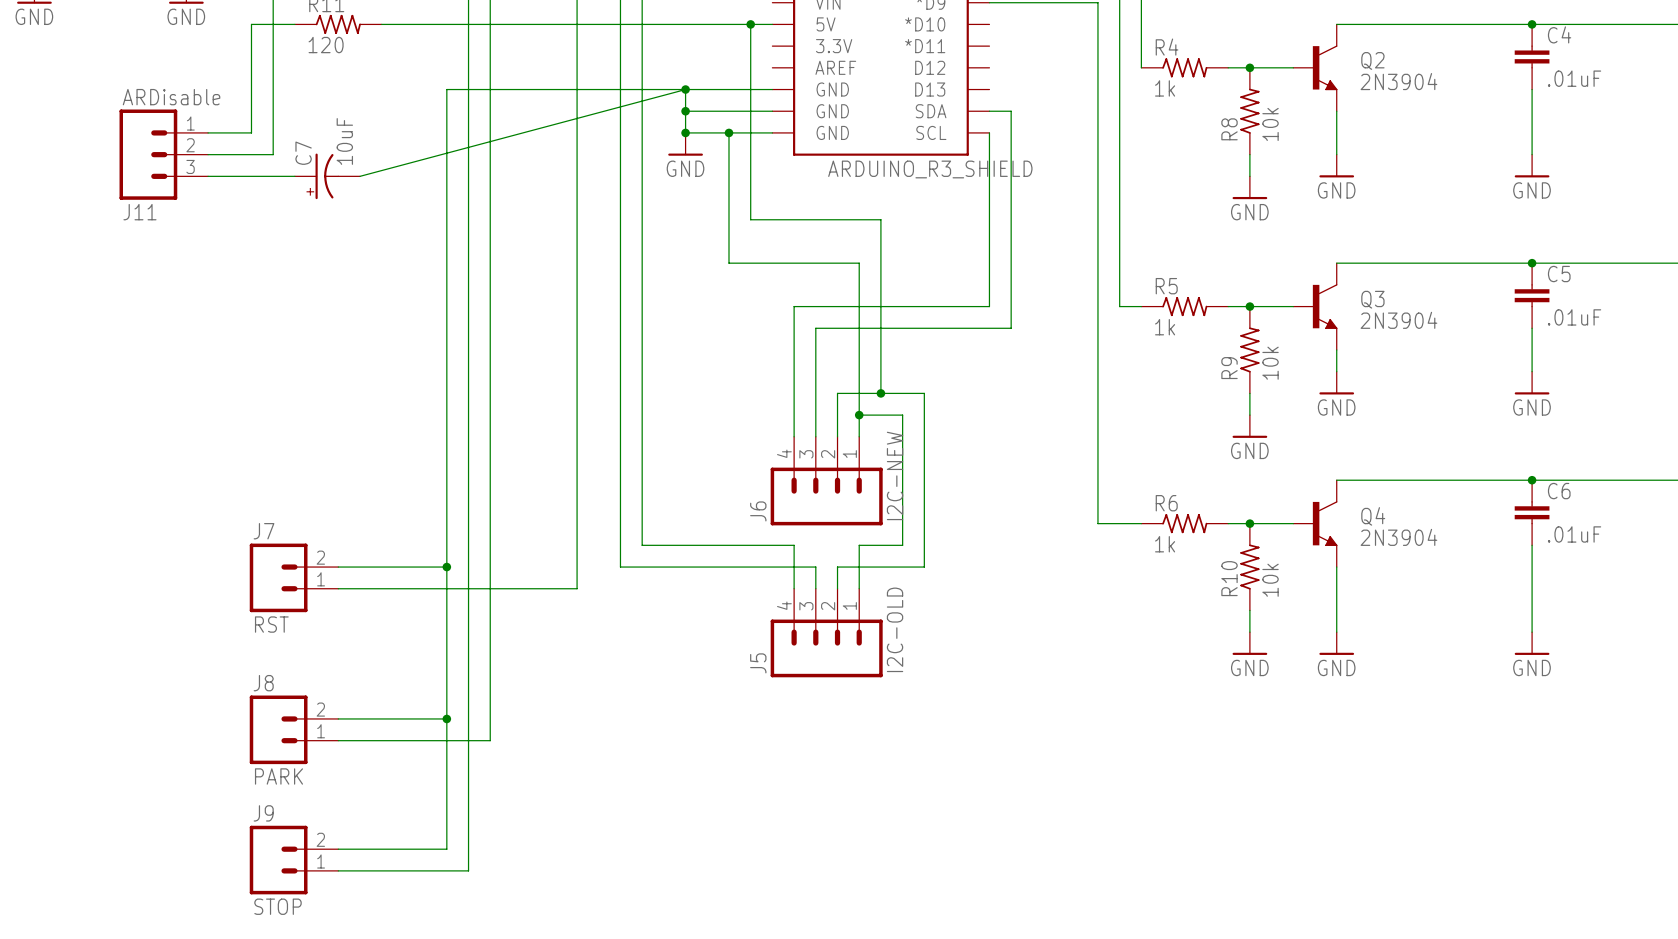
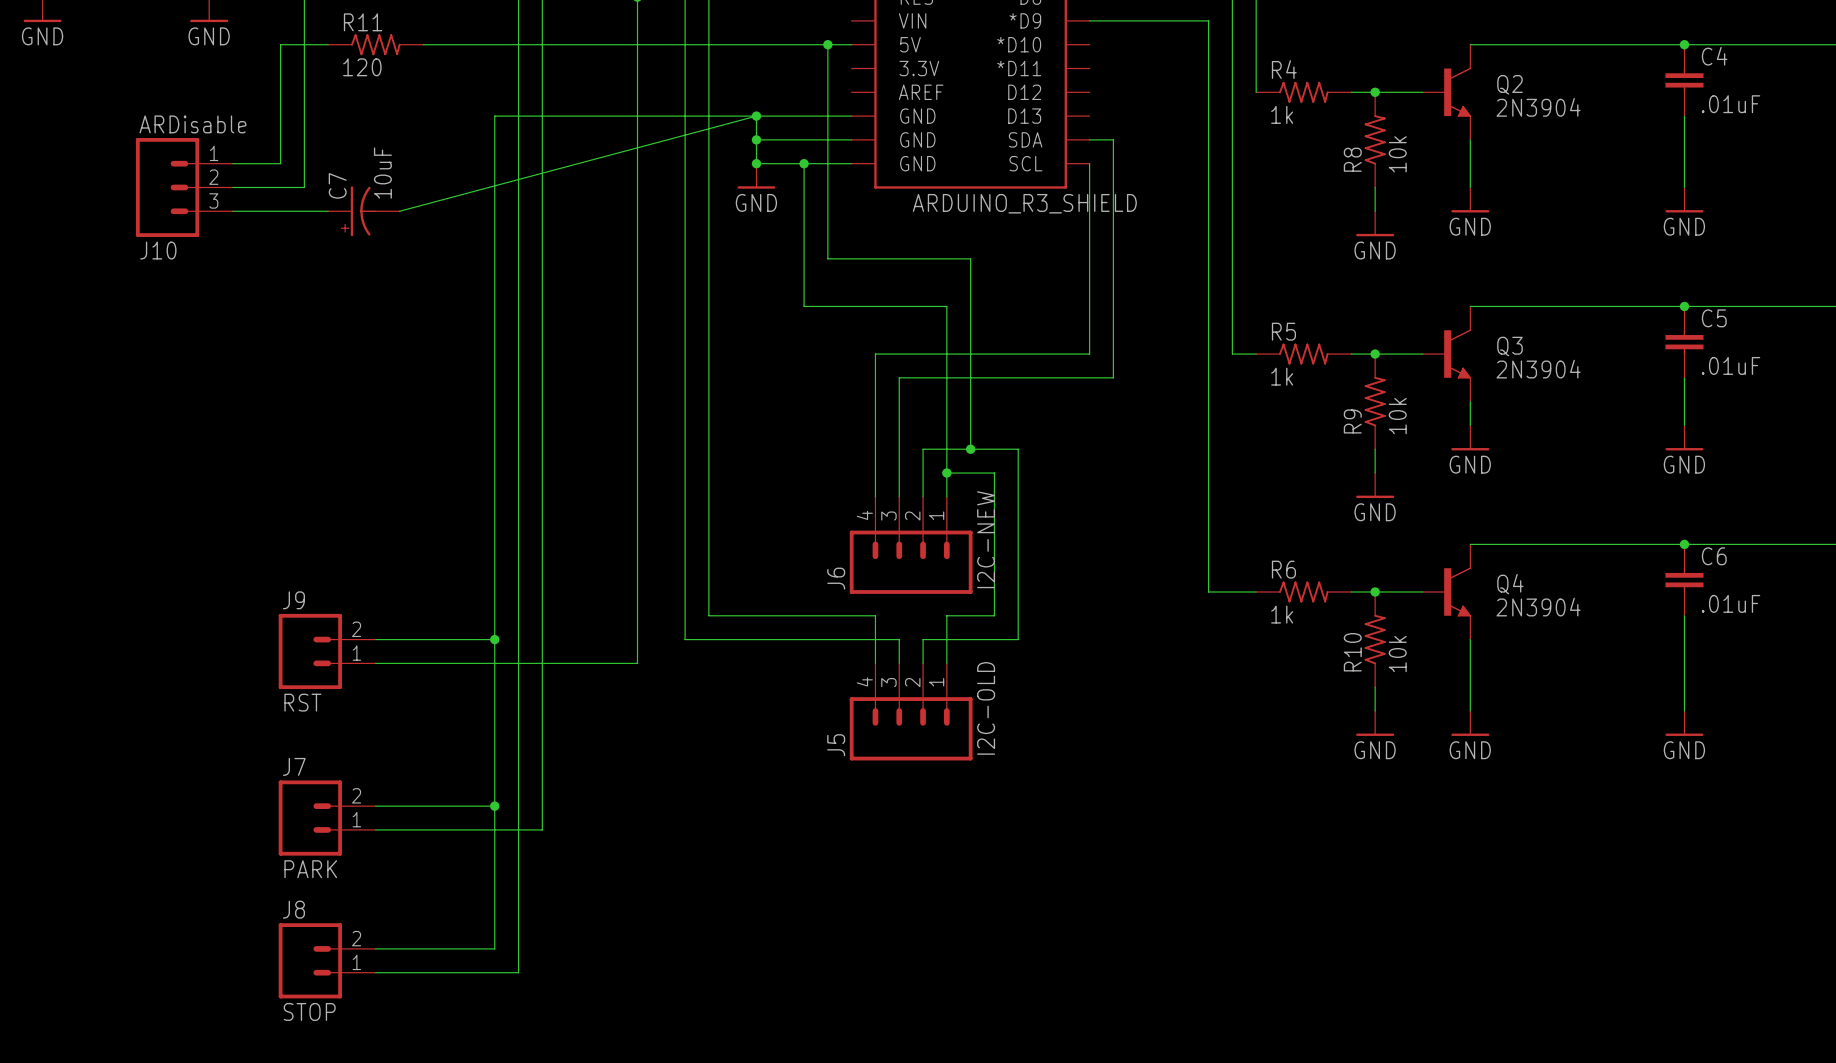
J11 name: J11 (139, 212) -> J10 (158, 250)
J7 name: J7 (264, 531) -> J9 (293, 600)
J8 name: J8 (263, 683) -> J7 (294, 766)
J9 name: J9 (263, 813) -> J8 (293, 909)

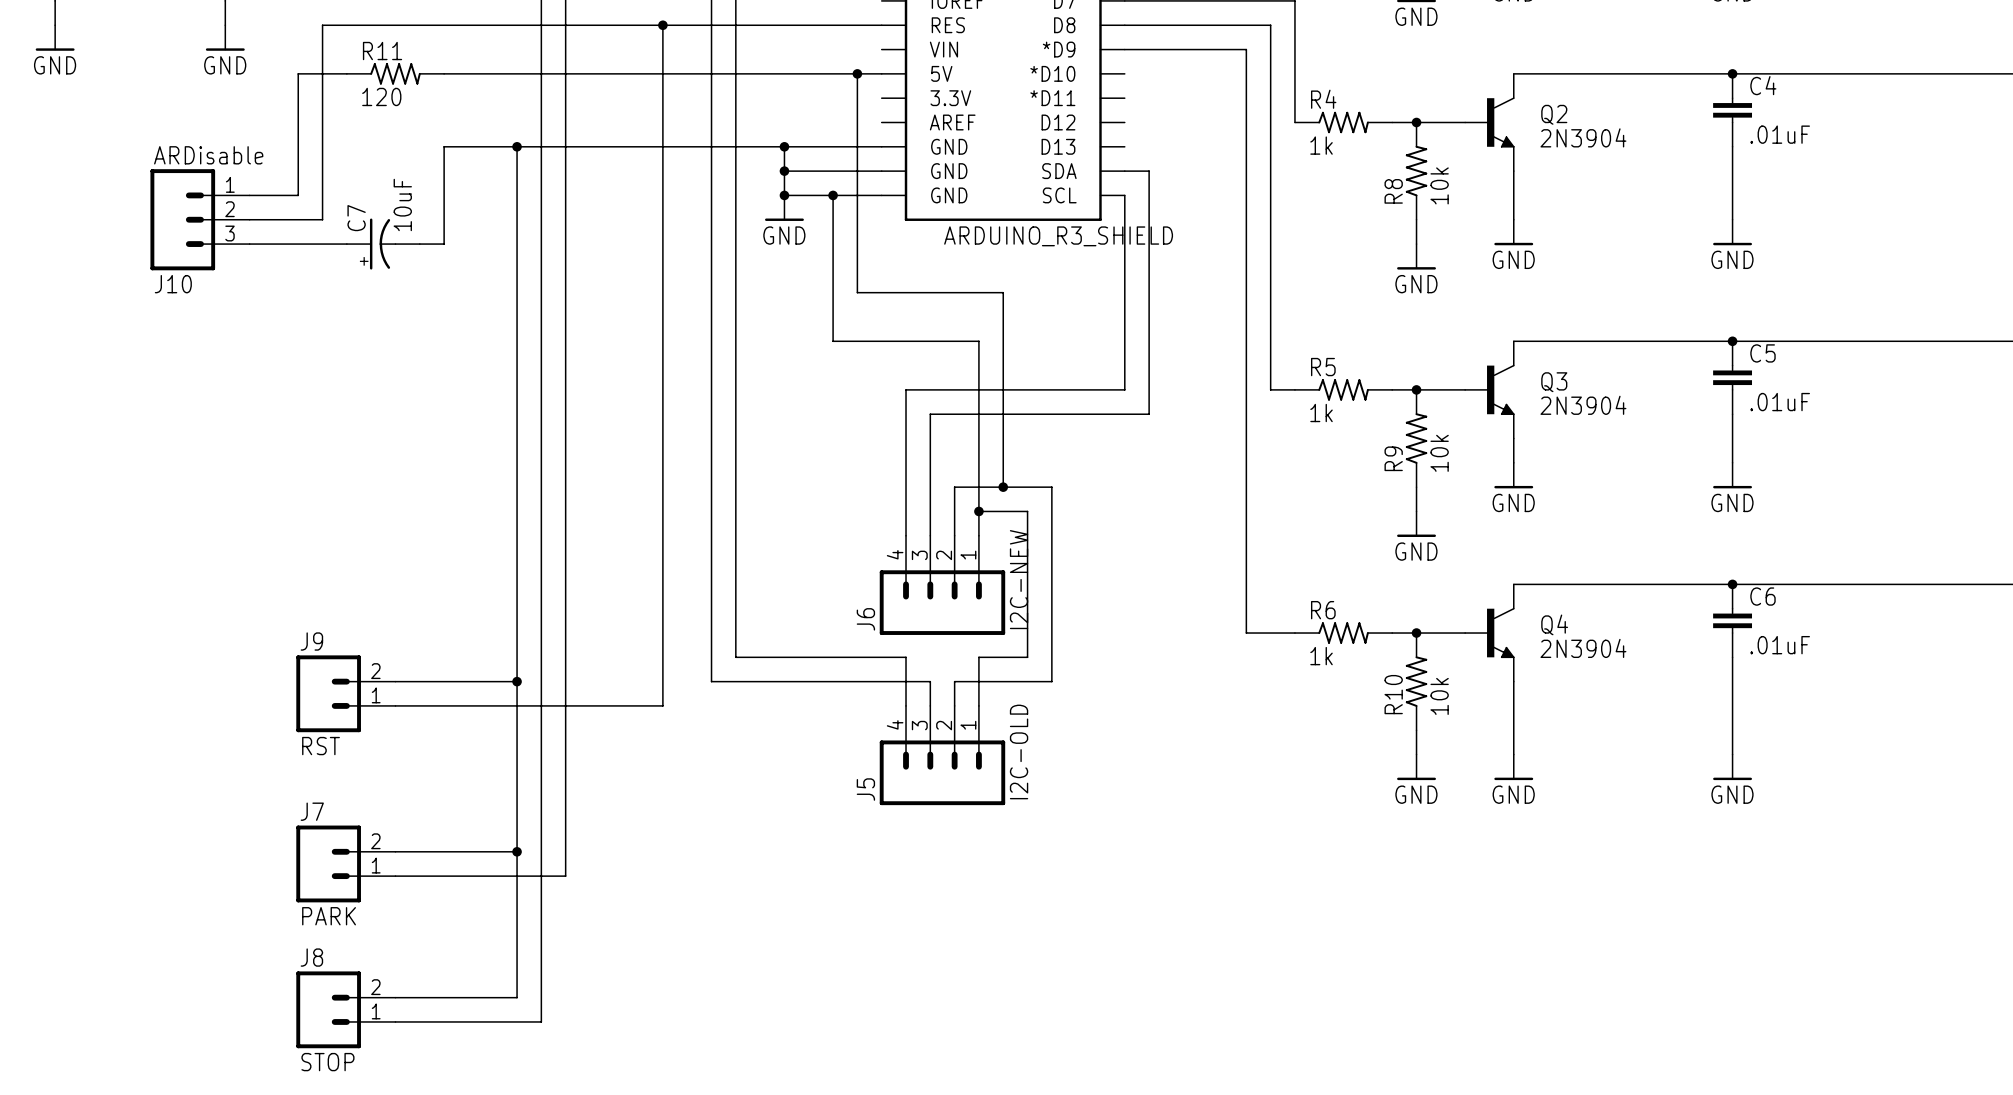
junction: none -> (517, 146)
wire: (756, 116) (399, 211) -> (517, 146) (444, 146) (444, 244) (419, 244)

